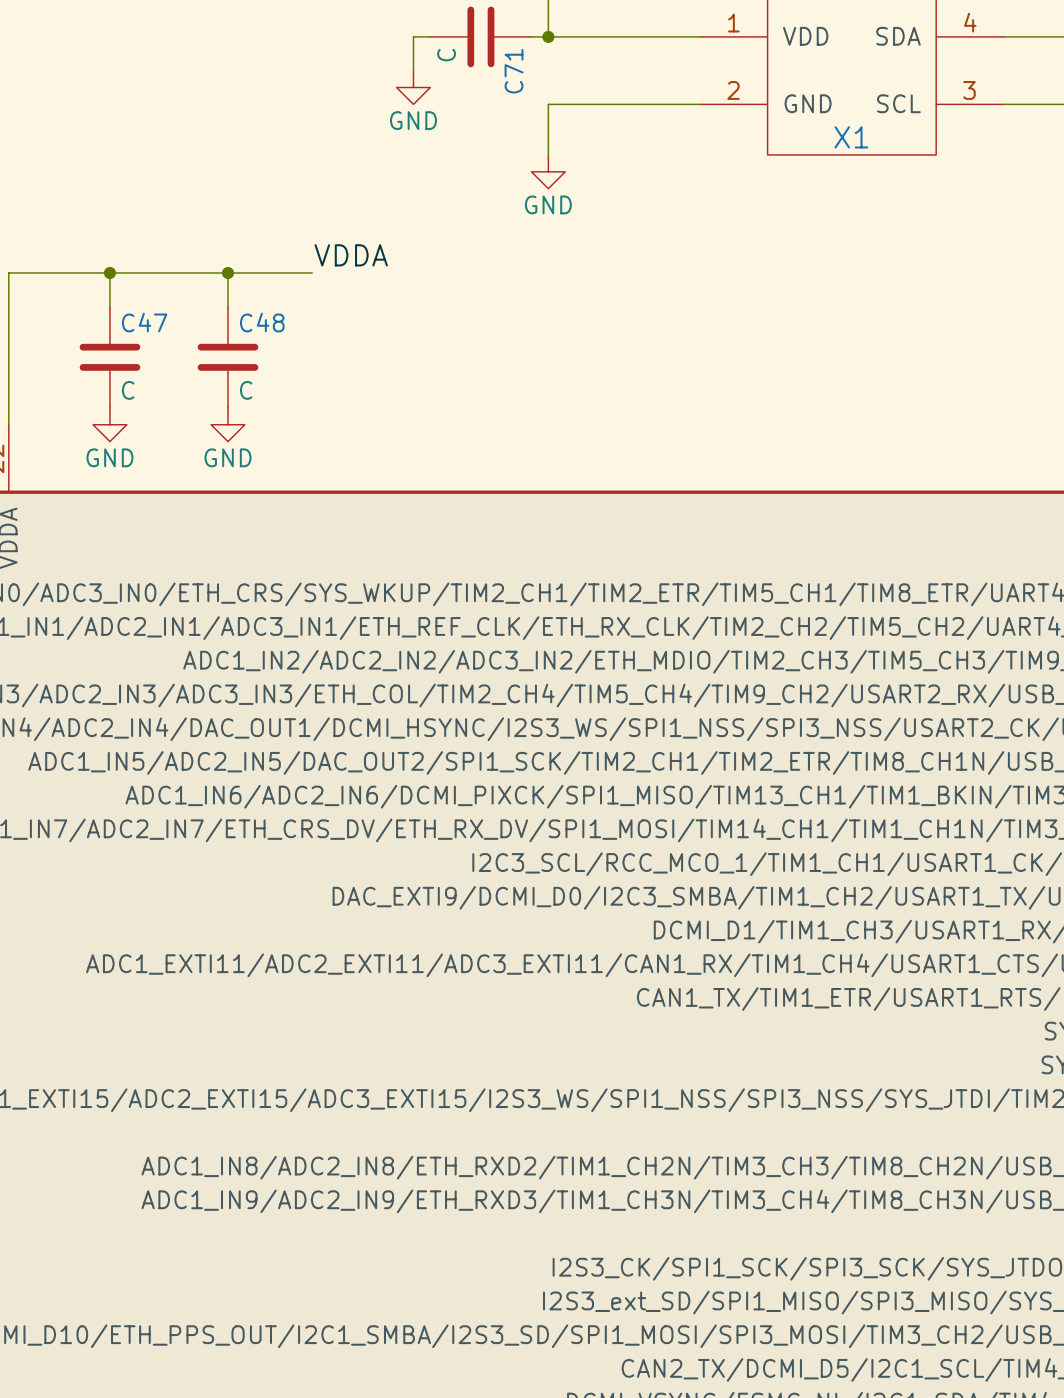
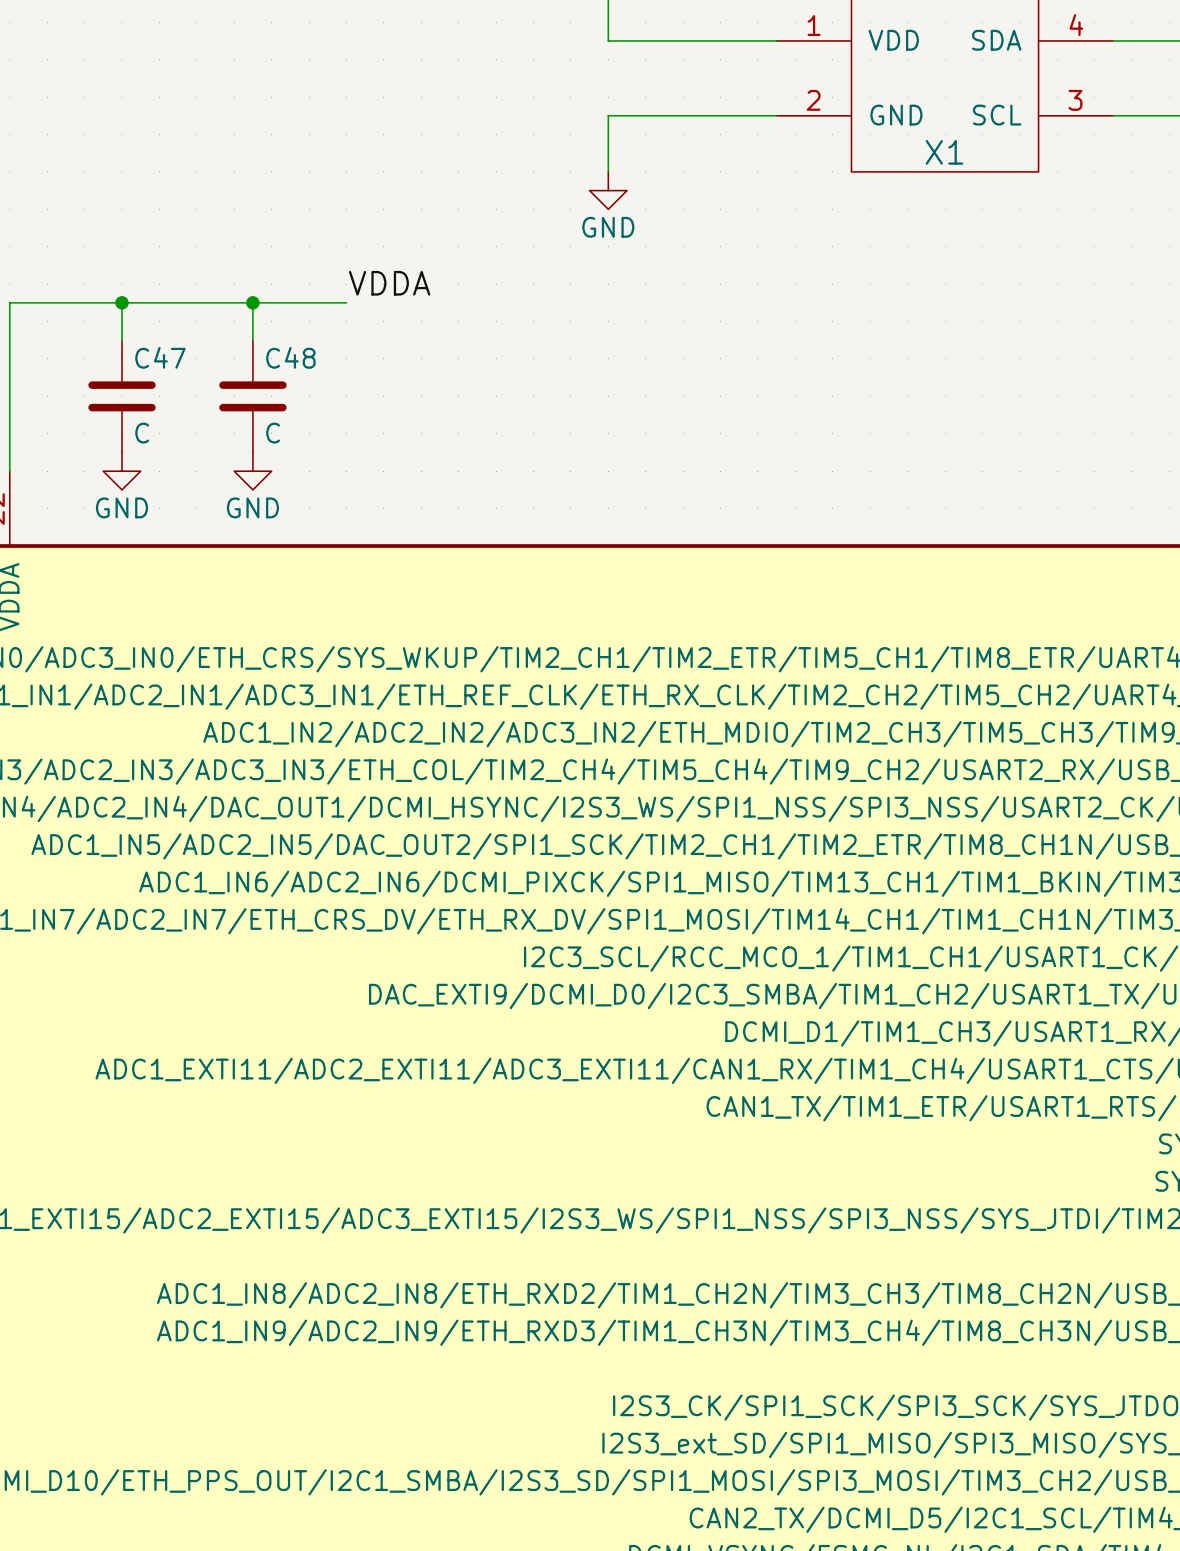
wire: (430, 36) (413, 36) (413, 70) -> none
C71: C (480, 36) -> none
wire: (531, 36) (548, 36) -> none
junction: (548, 36) -> none
power symbol: GND (413, 87) -> none

